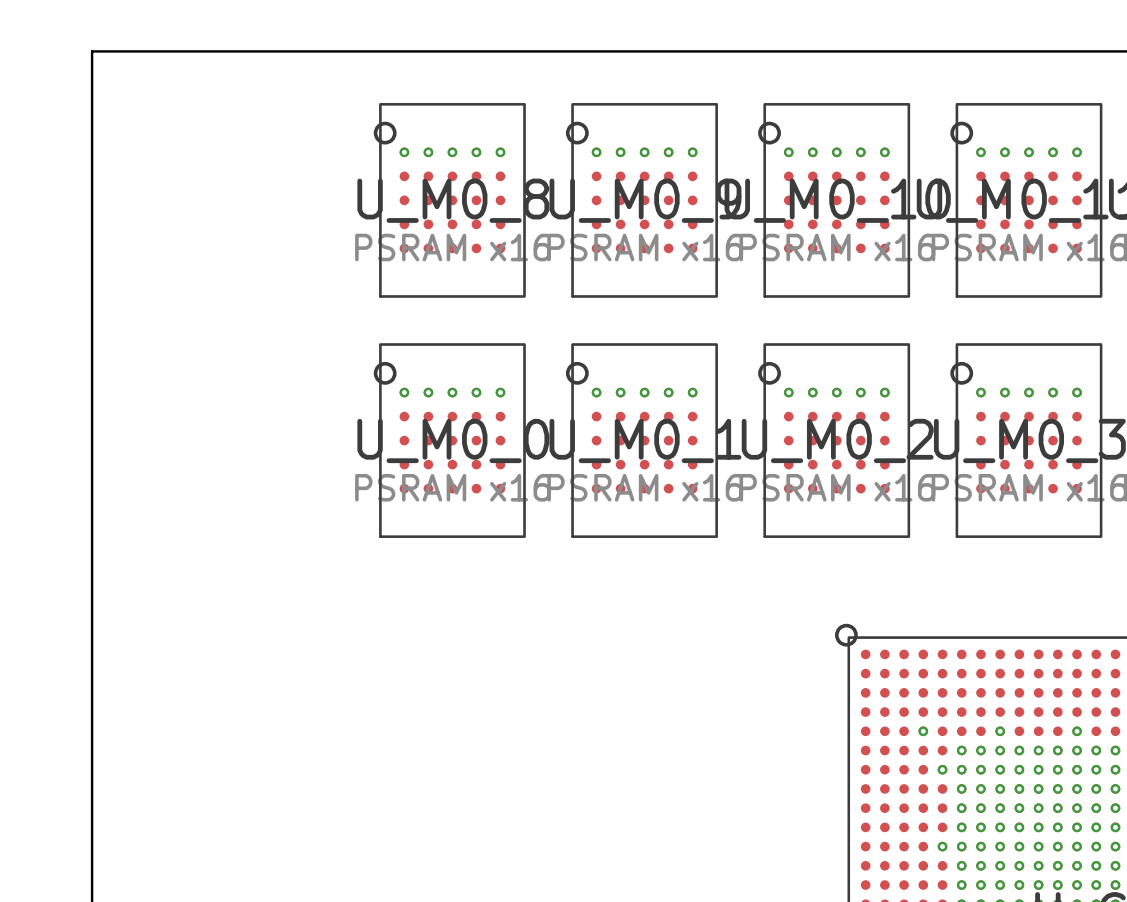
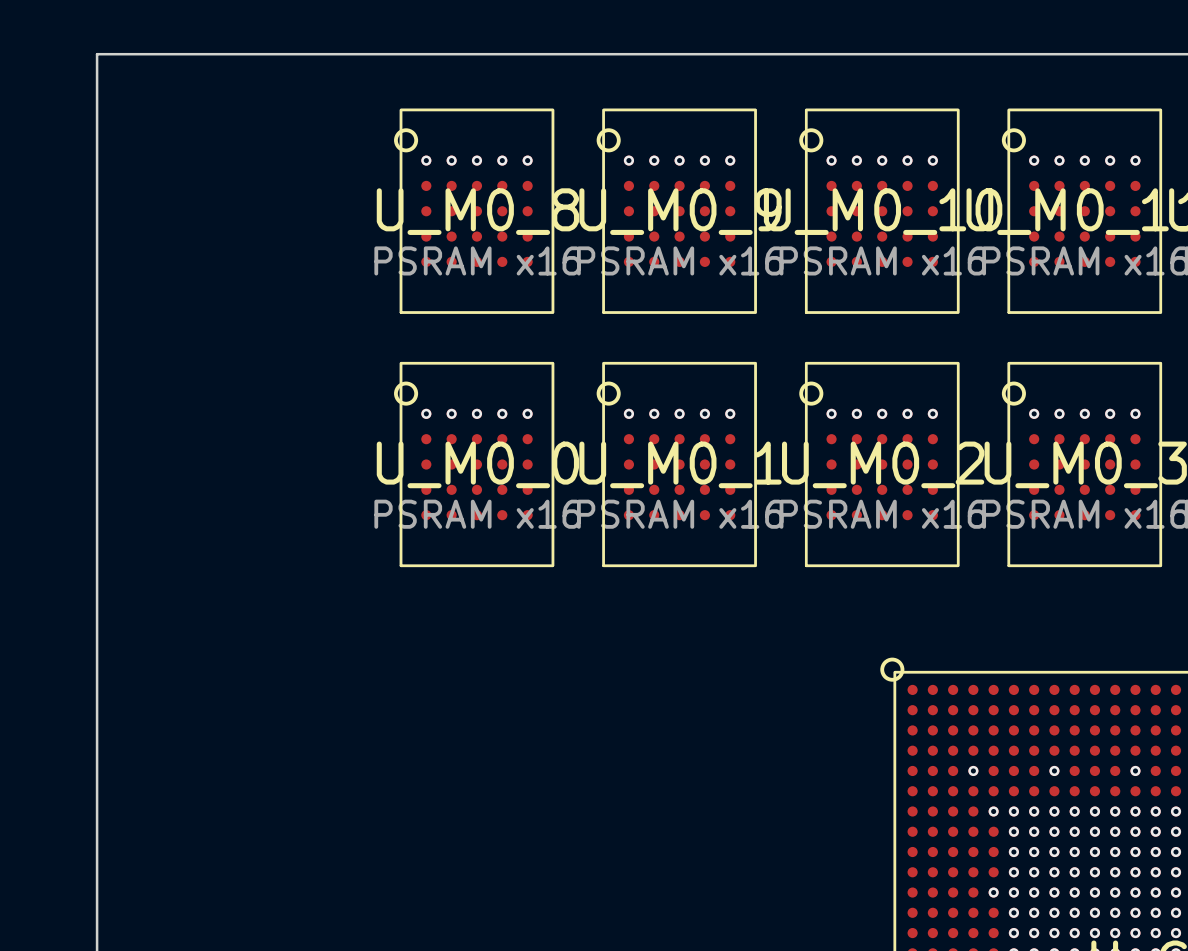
via: (961, 750) -> none
via: (980, 750) -> none
via: (1000, 750) -> none
via: (1019, 750) -> none
via: (1038, 750) -> none
via: (1057, 750) -> none
via: (1077, 750) -> none
via: (1096, 750) -> none
via: (1115, 750) -> none

